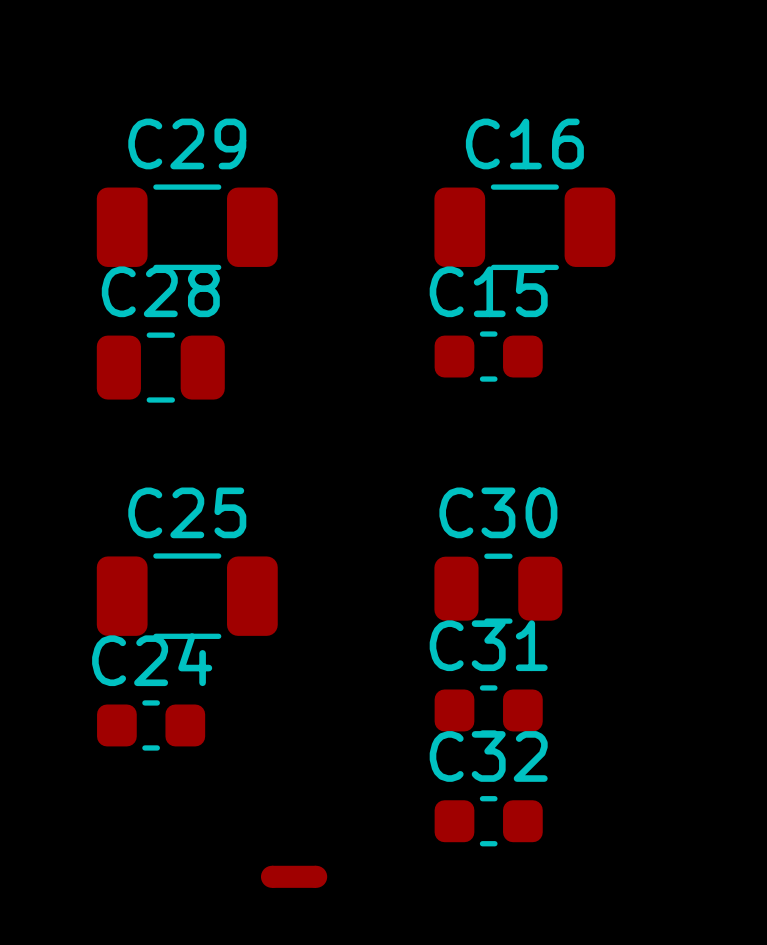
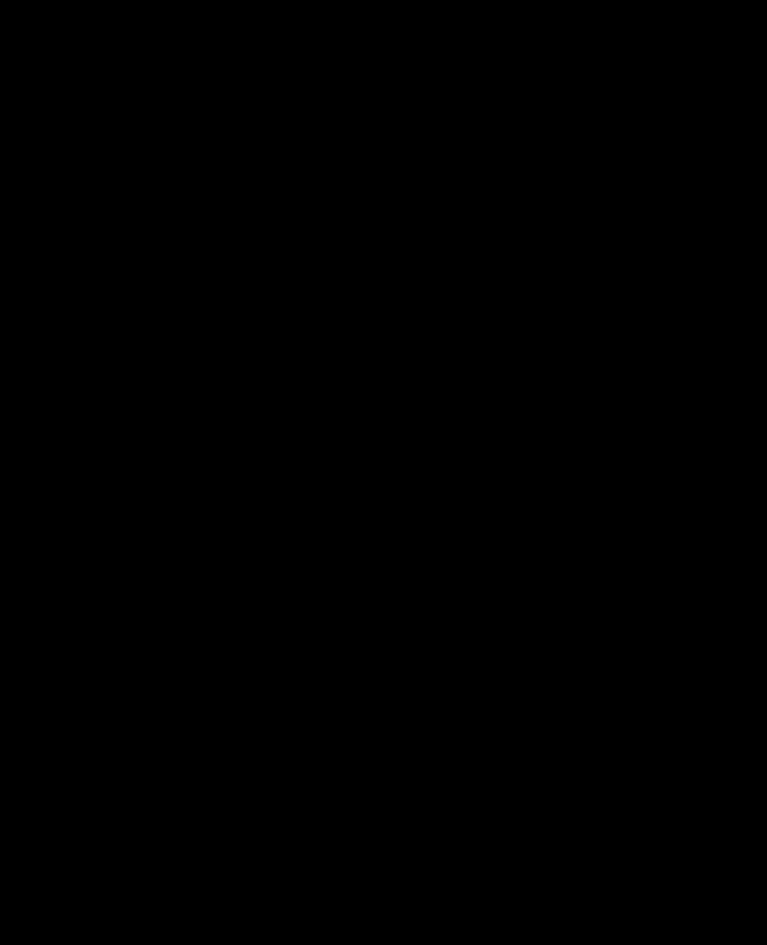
C29: (187, 227) -> none
C16: (524, 227) -> none
C15: (488, 356) -> none
C28: (160, 367) -> none
C30: (498, 588) -> none
C25: (187, 596) -> none
C31: (488, 710) -> none
C24: (151, 725) -> none
C32: (488, 821) -> none
part: (294, 876) -> none

